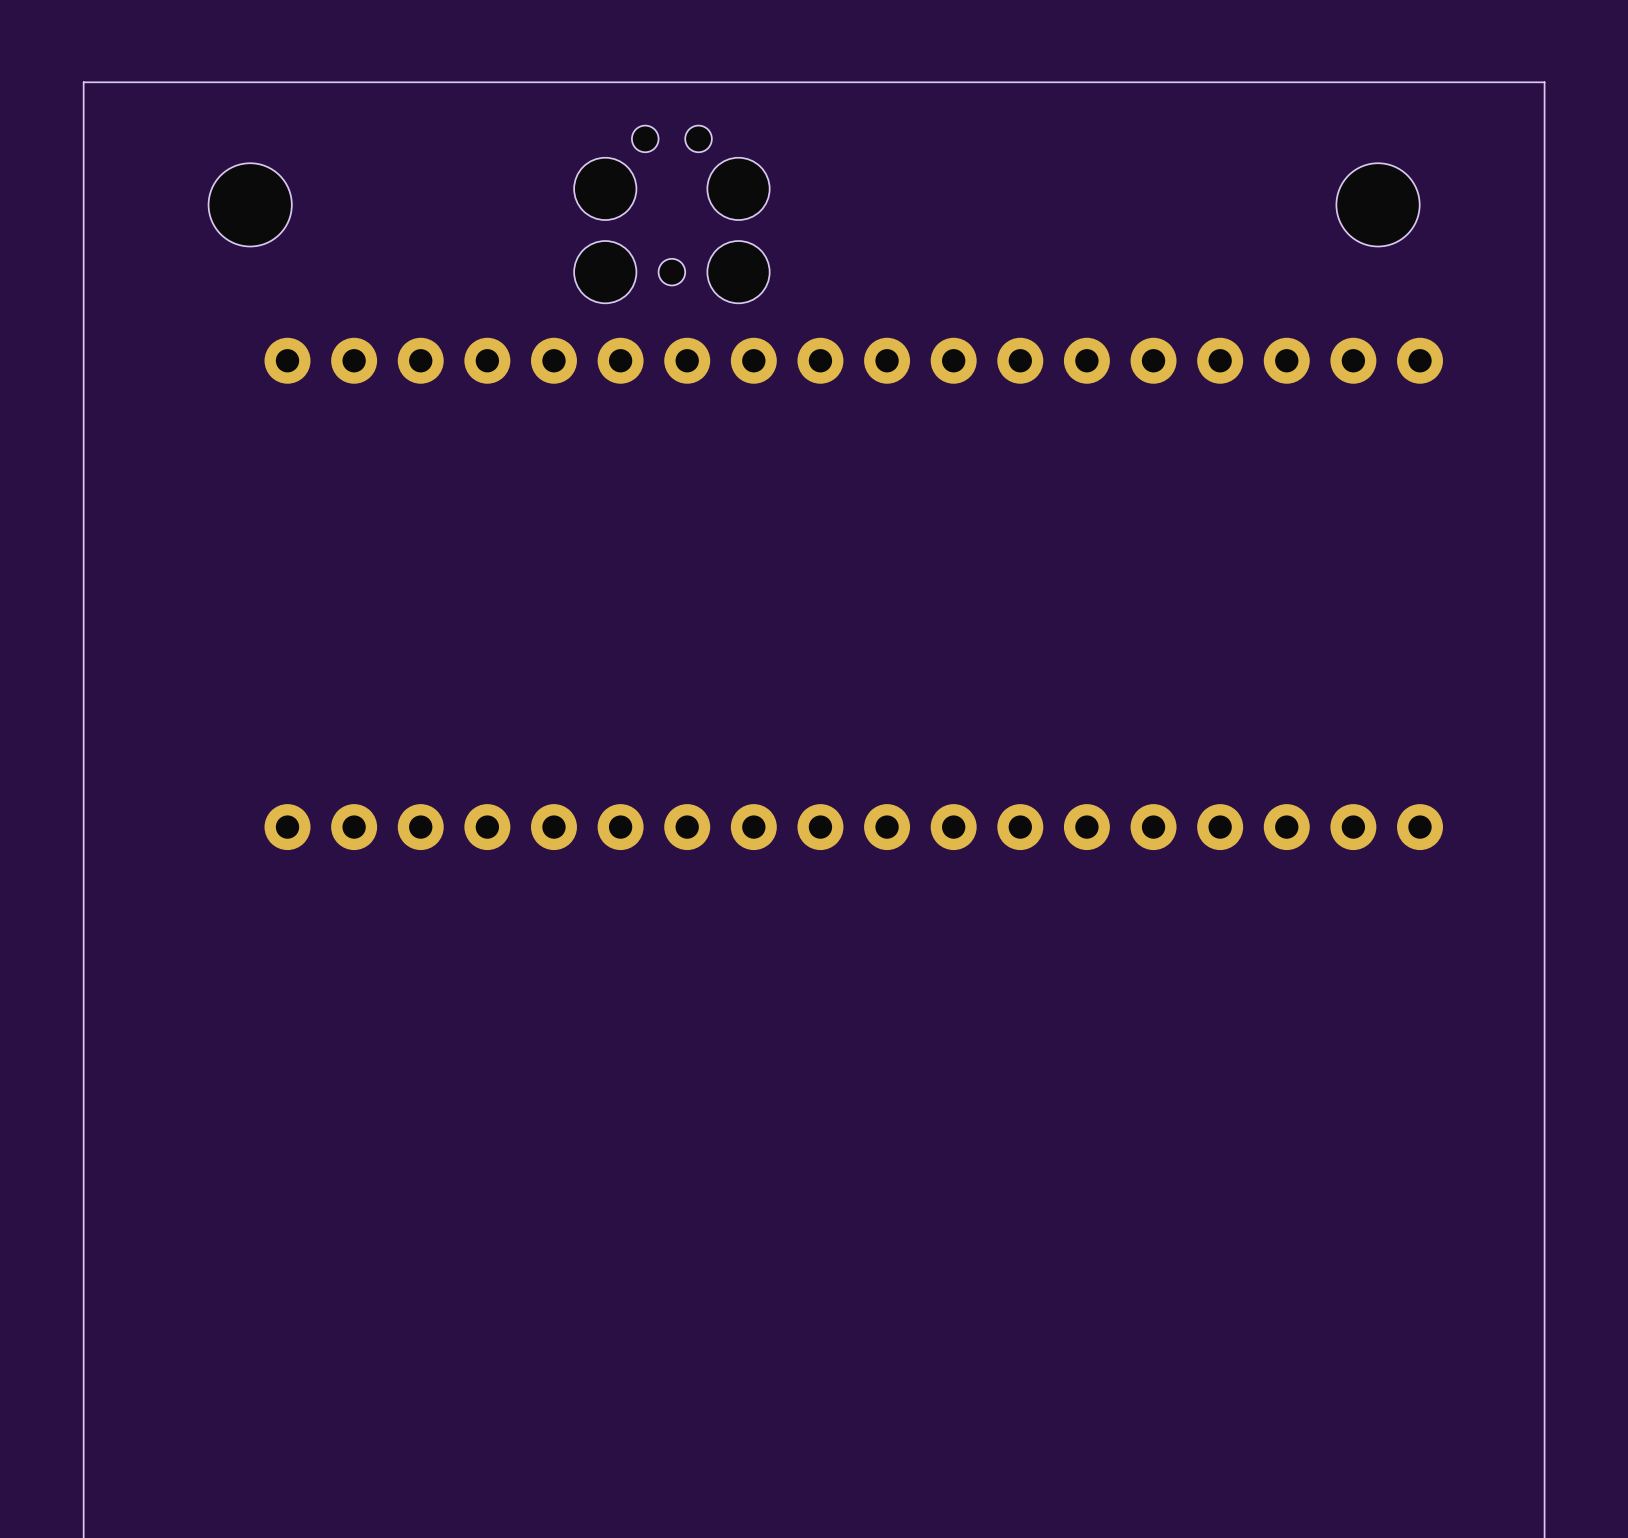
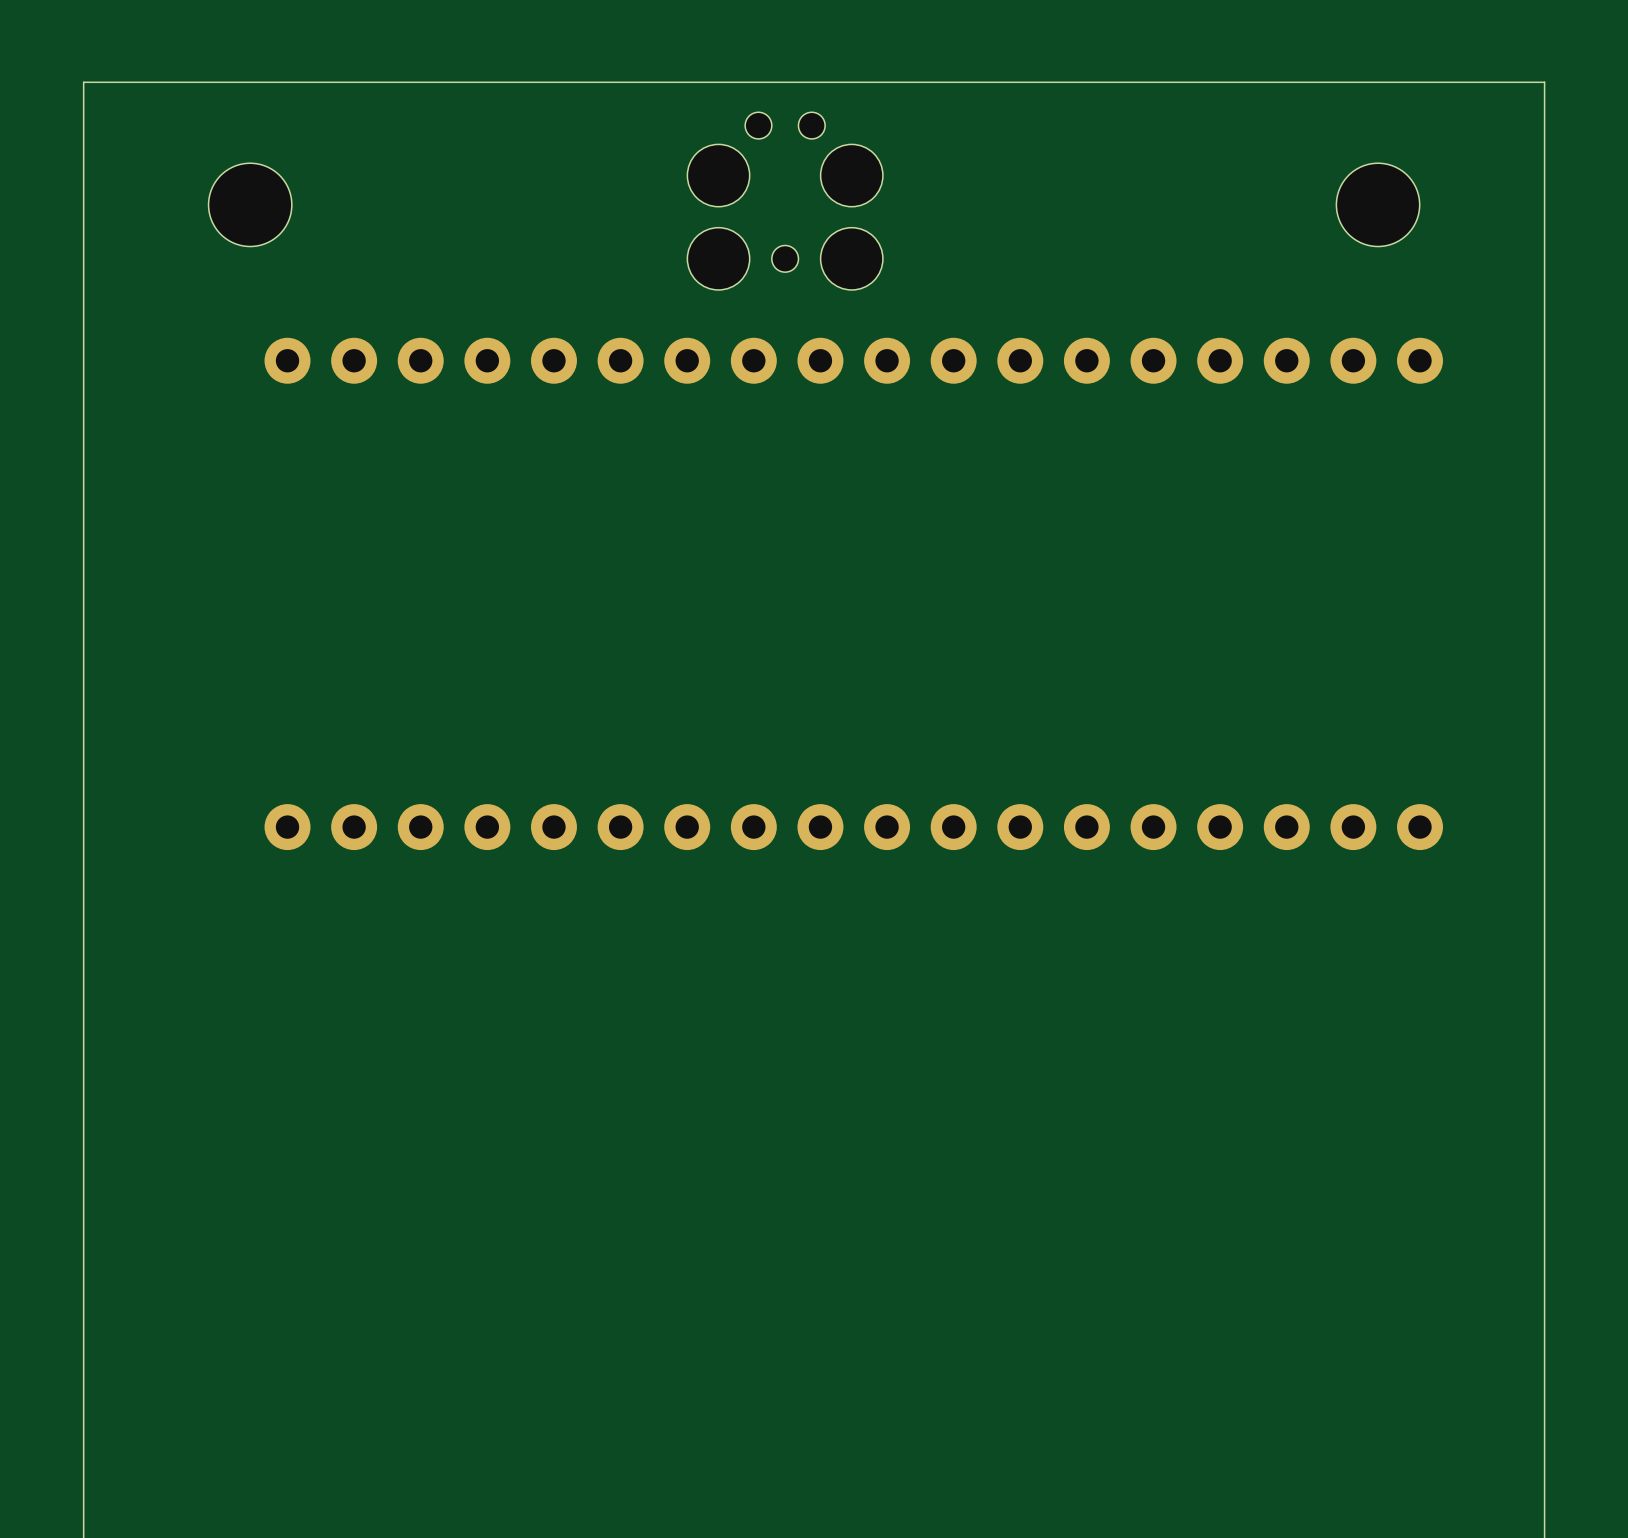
part position: (671, 214) -> (785, 201)

